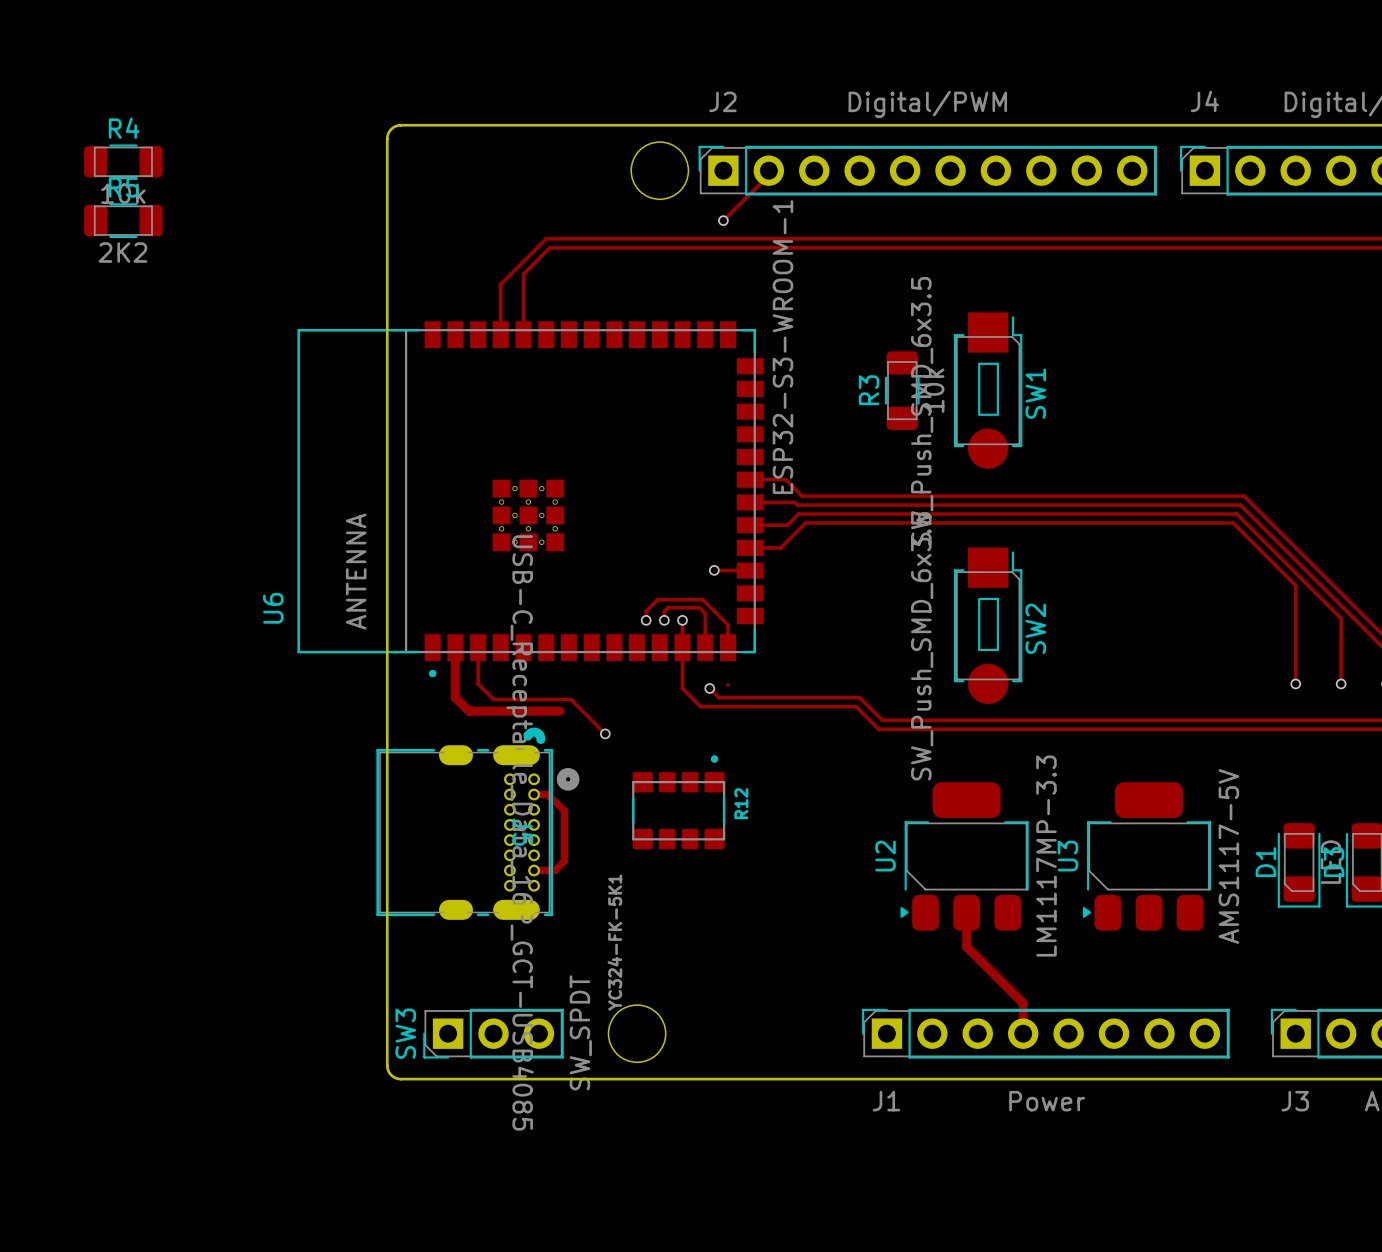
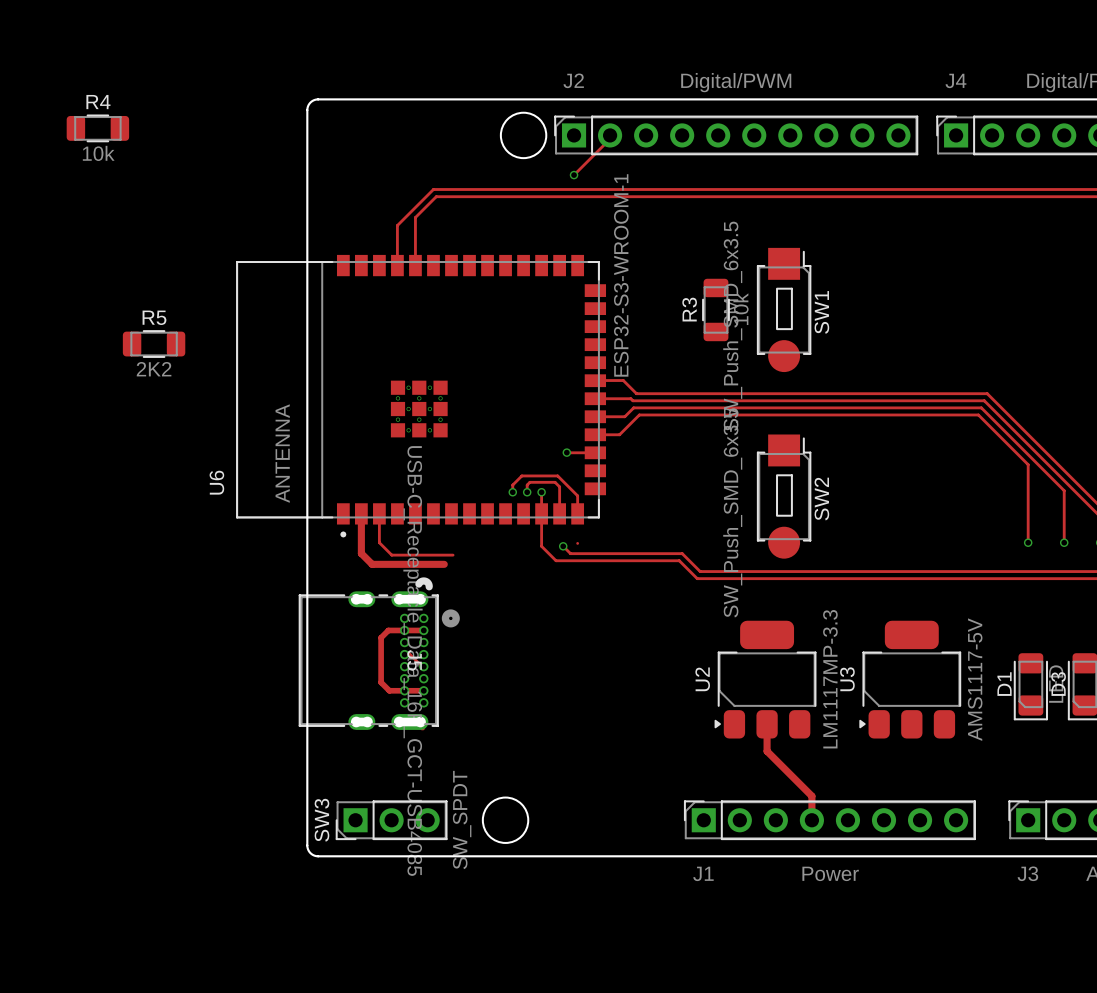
R5 position: (123, 220) -> (154, 344)
track: (570, 699) (605, 733) -> none
via: (605, 733) -> none
track: (534, 794) (547, 794) (564, 811) (564, 861) (555, 870) -> (423, 630) (388, 630) (381, 637) (381, 682) (389, 690) (423, 690)
R12: YC324-FK-5K1 (678, 802) -> none
track: (534, 870) (555, 870) -> none

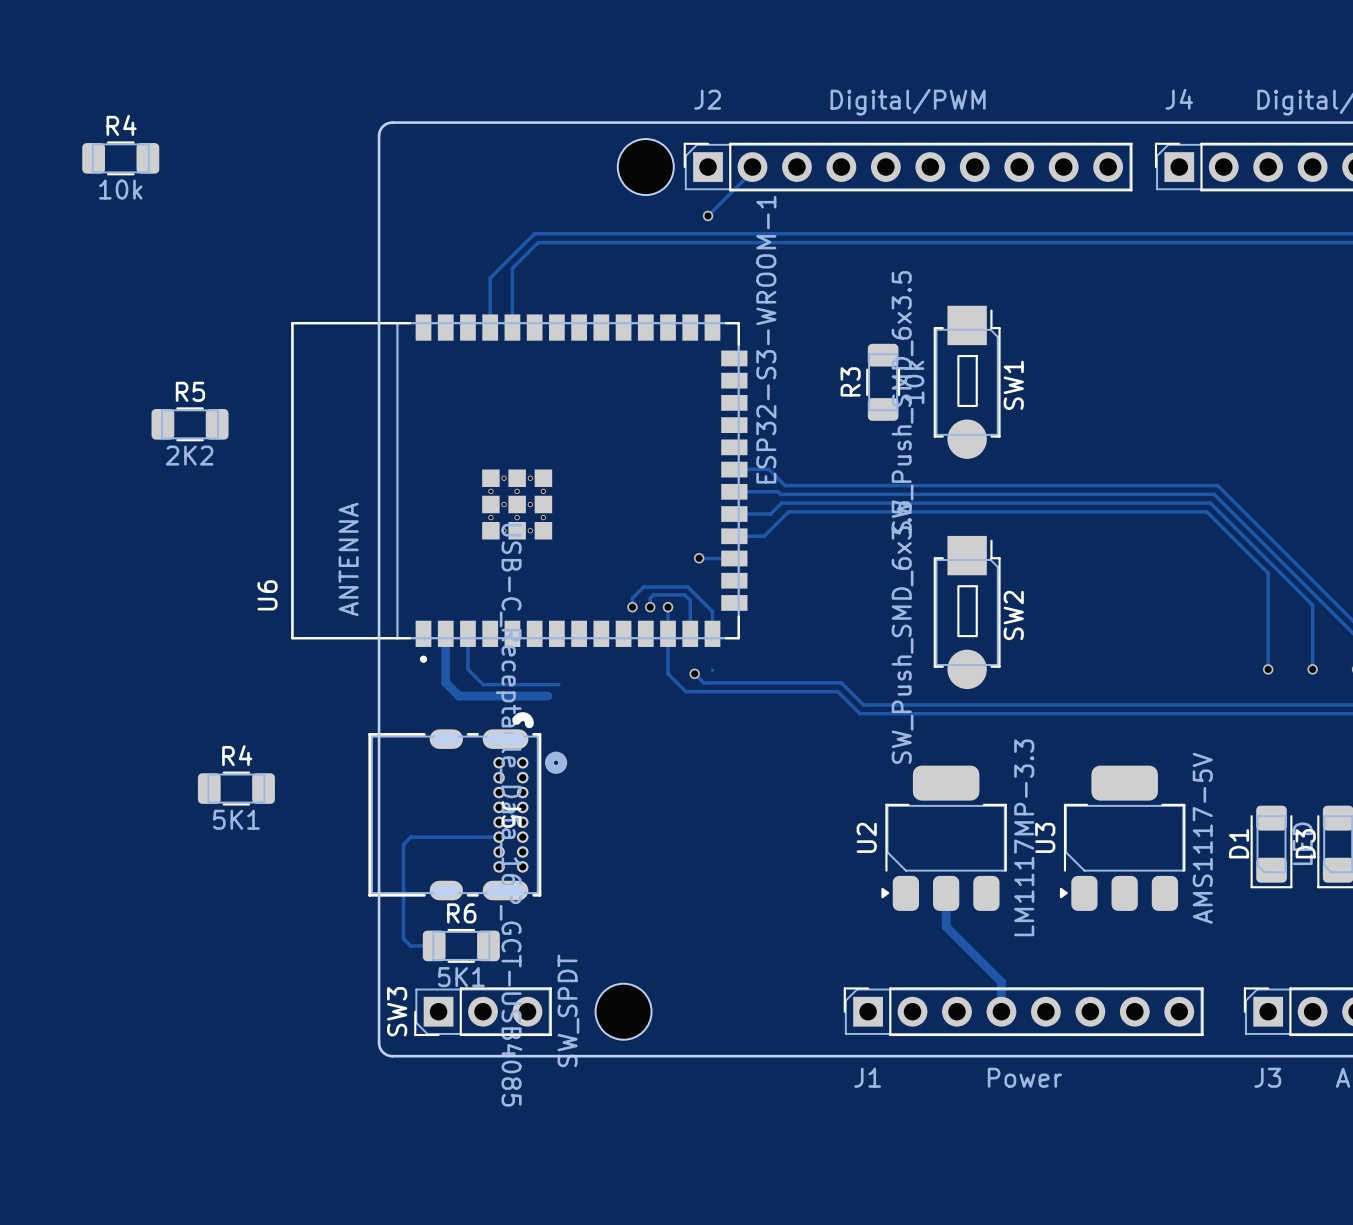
track: (423, 630) (388, 630) (381, 637) (381, 682) (389, 690) (423, 690) -> none
R4: none -> 5K1 (236, 788)
track: none -> (499, 837) (410, 837) (403, 844) (403, 938) (410, 945) (434, 945)
R6: none -> 5K1 (461, 945)

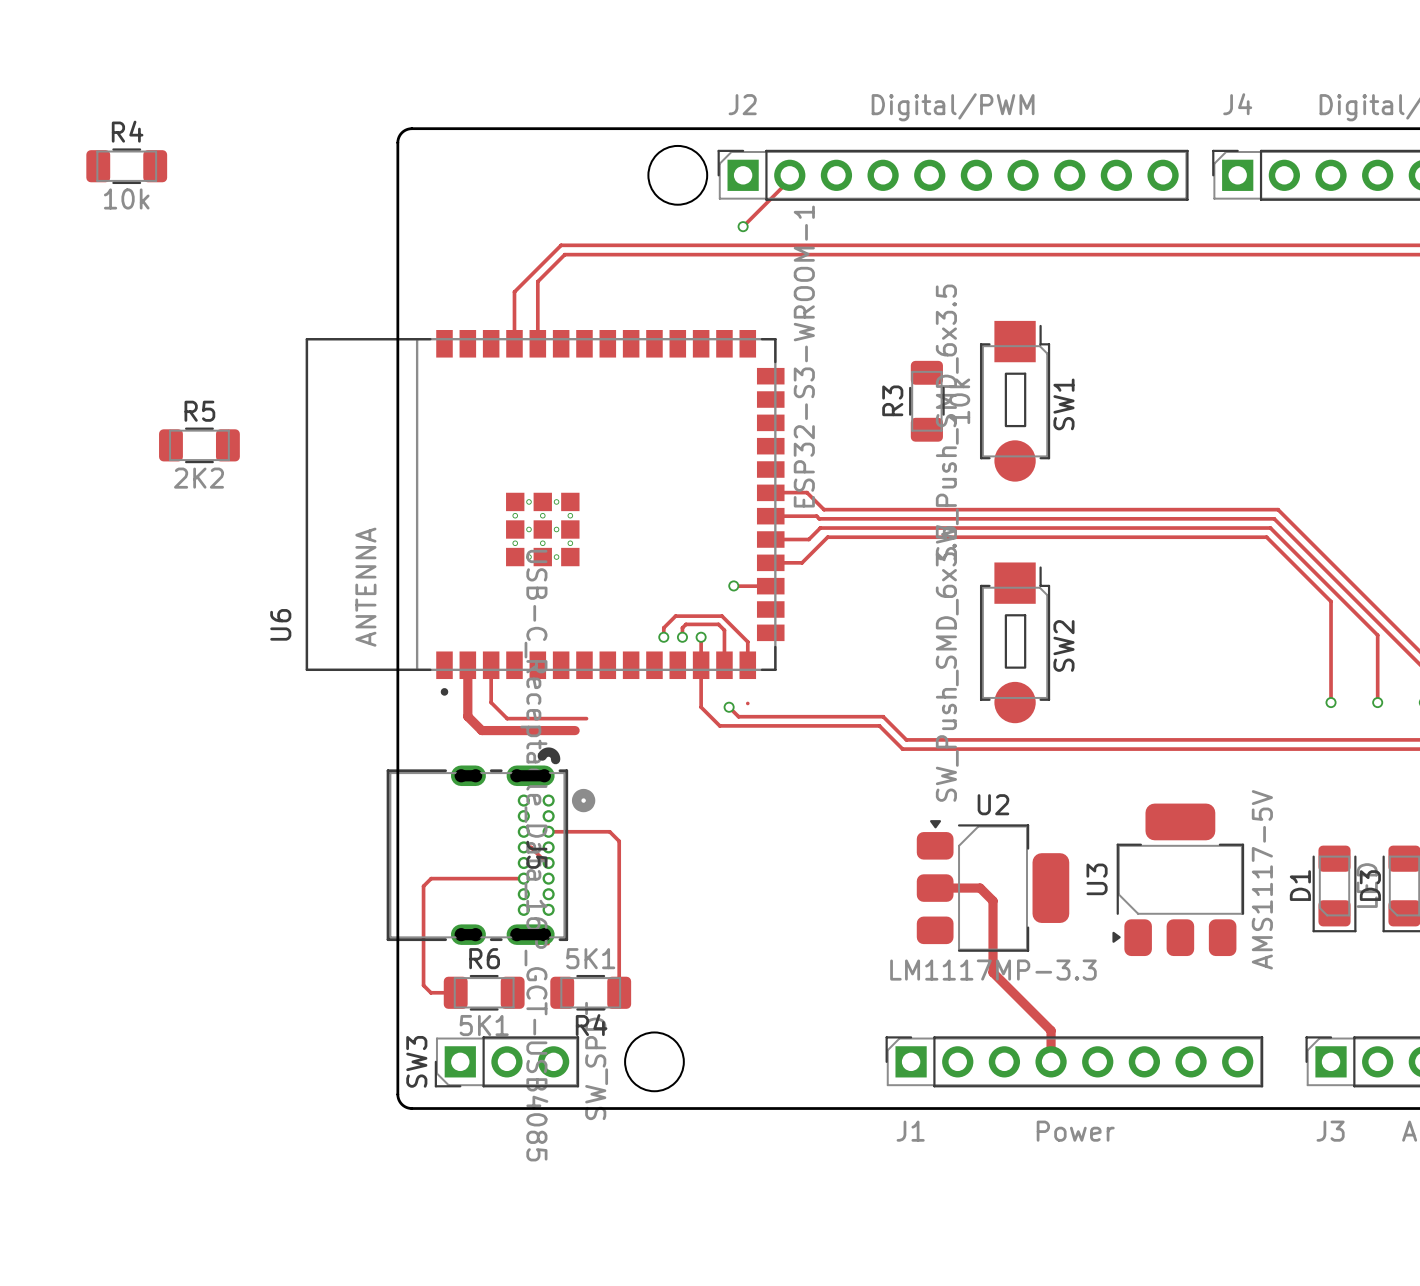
R4 name position: R4 (237, 755) -> R4 (591, 1025)
R4 position: (236, 788) -> (590, 992)
track: none -> (548, 831) (609, 831) (619, 841) (619, 992)
R4 value position: 5K1 (236, 819) -> 5K1 (590, 958)
U2 rotation: 0° (944, 838) -> 90° clockwise (993, 885)
track: none -> (935, 888) (980, 888) (993, 900) (993, 937)

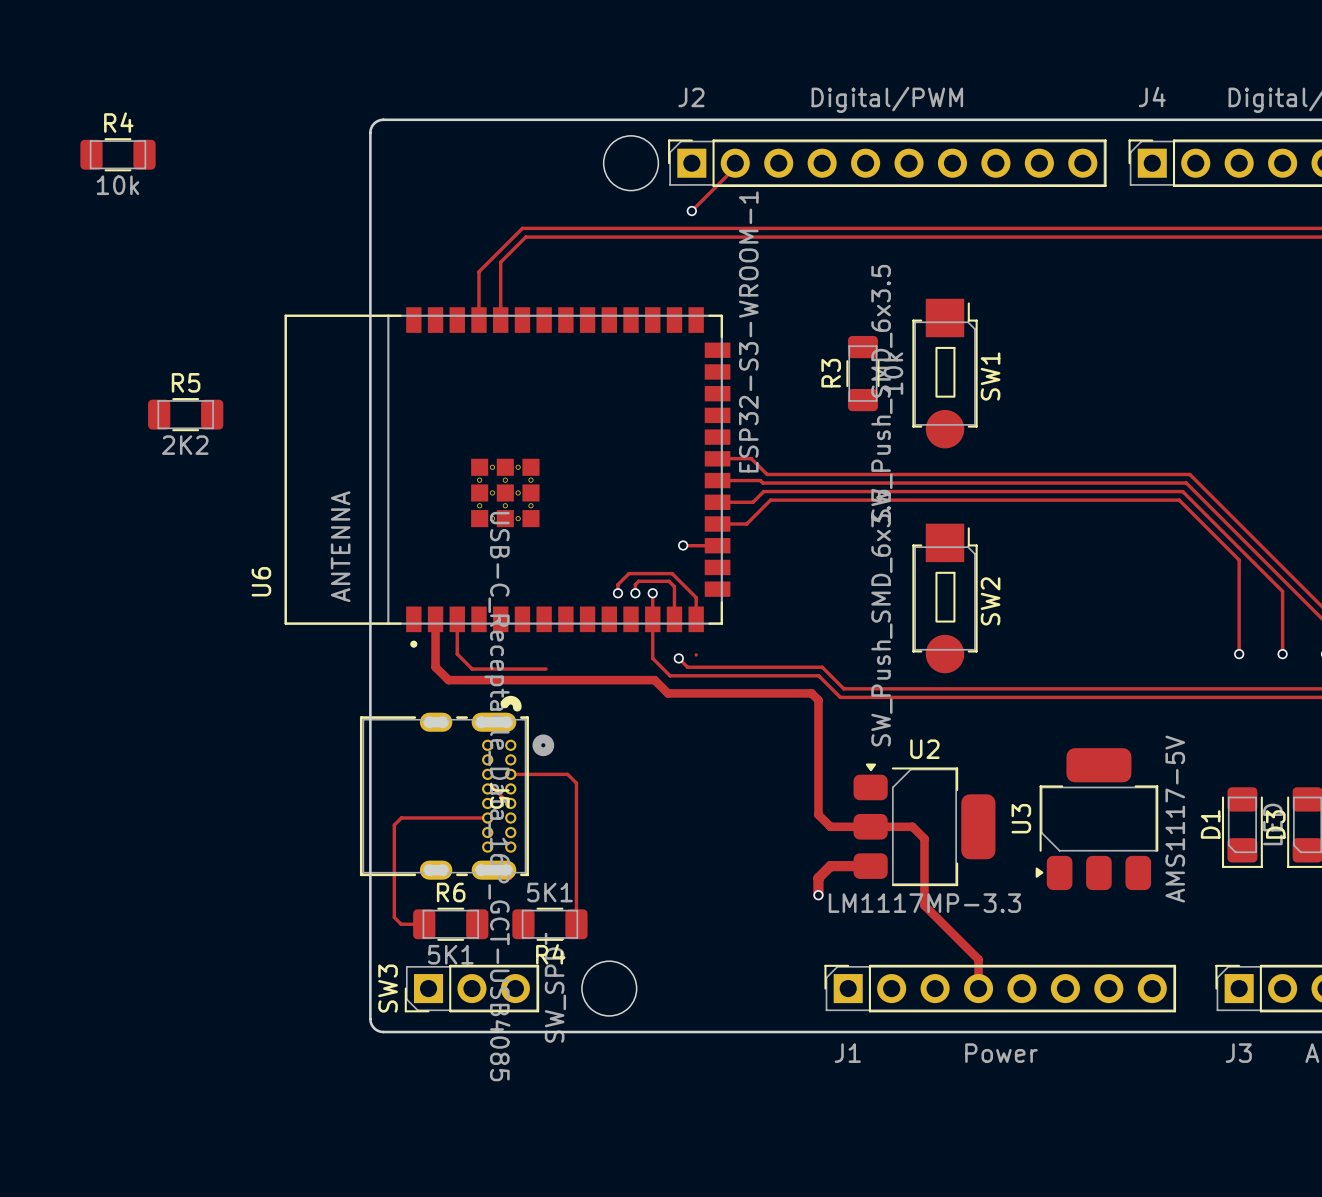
track: none -> (535, 680) (654, 680) (667, 693) (811, 693) (818, 700) (818, 814) (830, 826) (870, 826)
track: none -> (870, 866) (830, 866) (818, 878) (818, 895)
via: none -> (818, 895)

